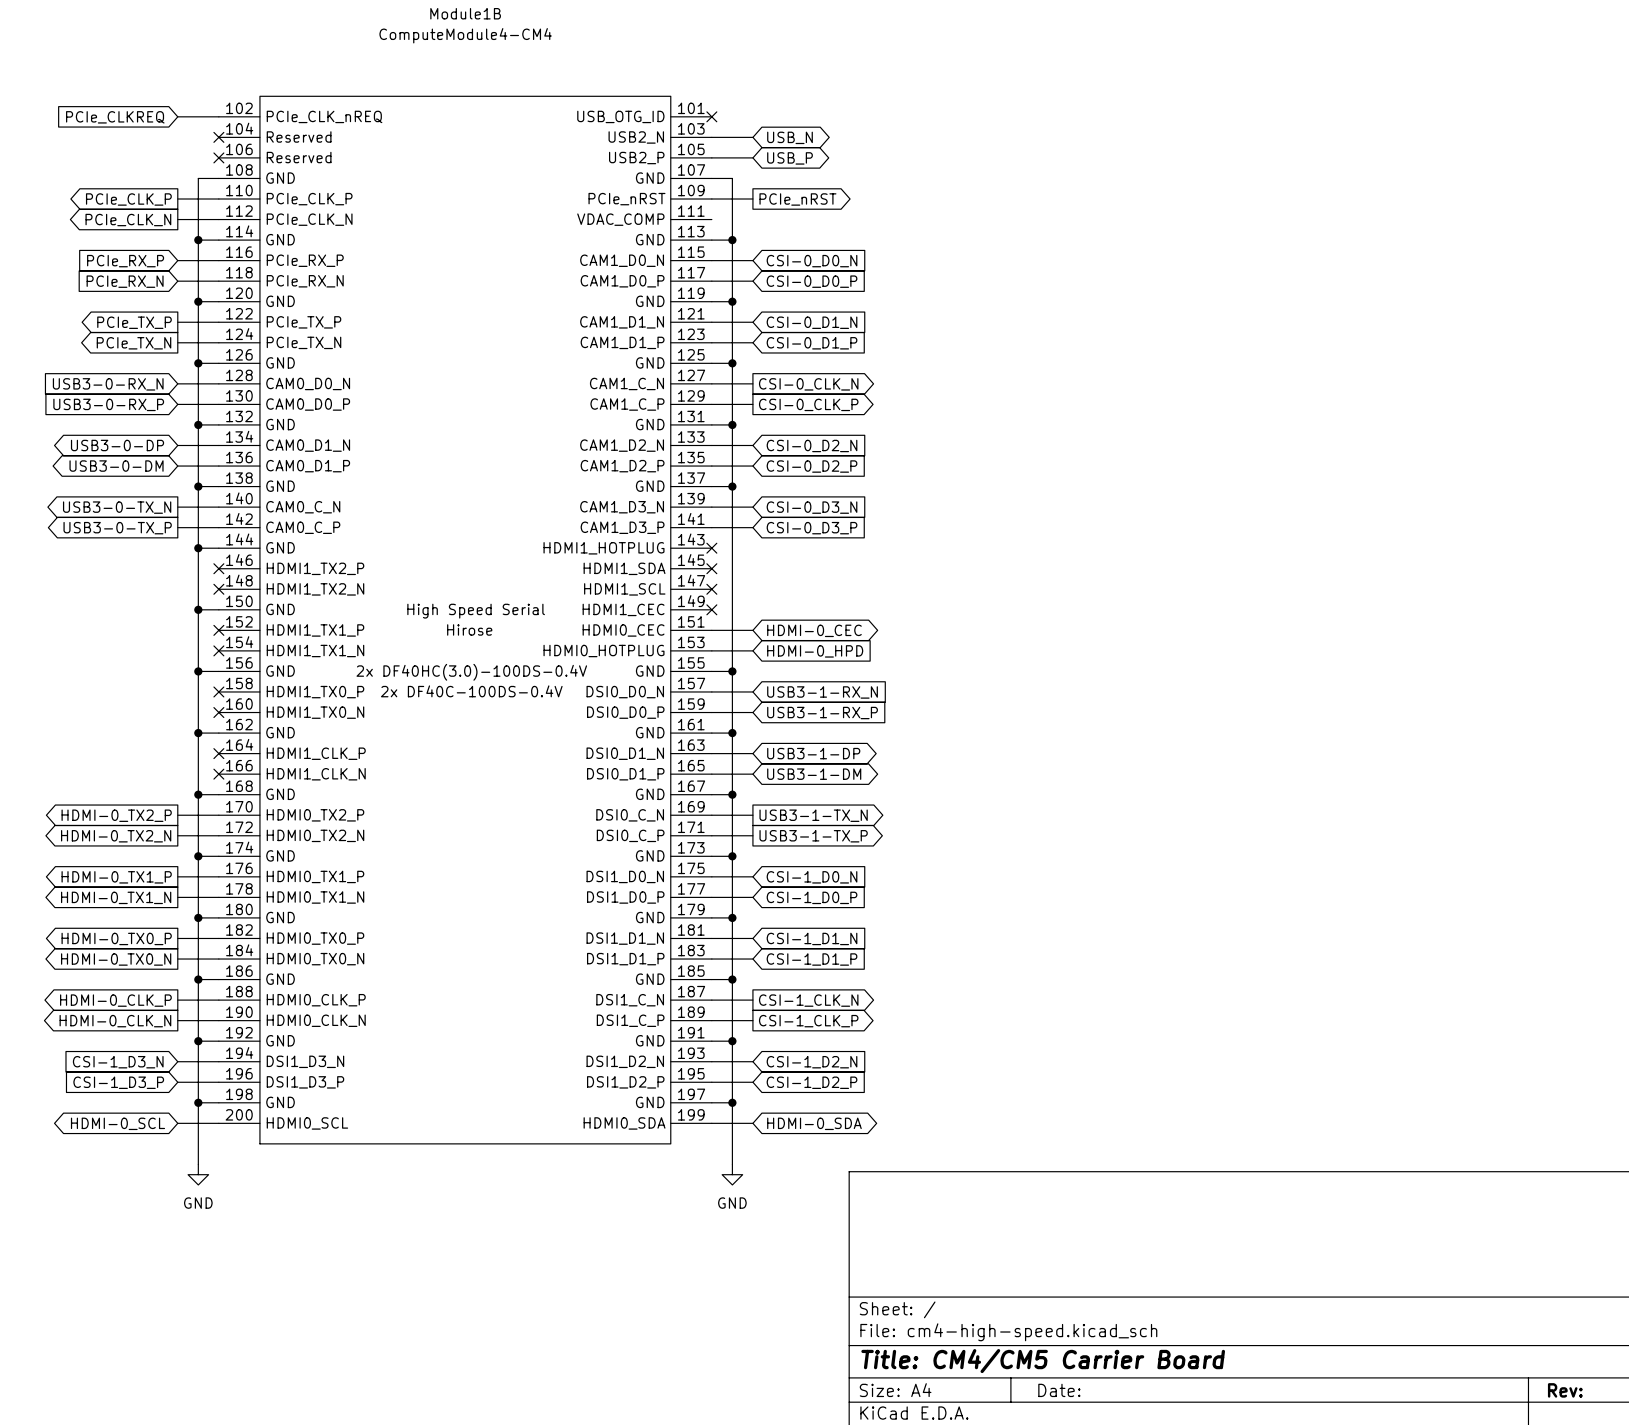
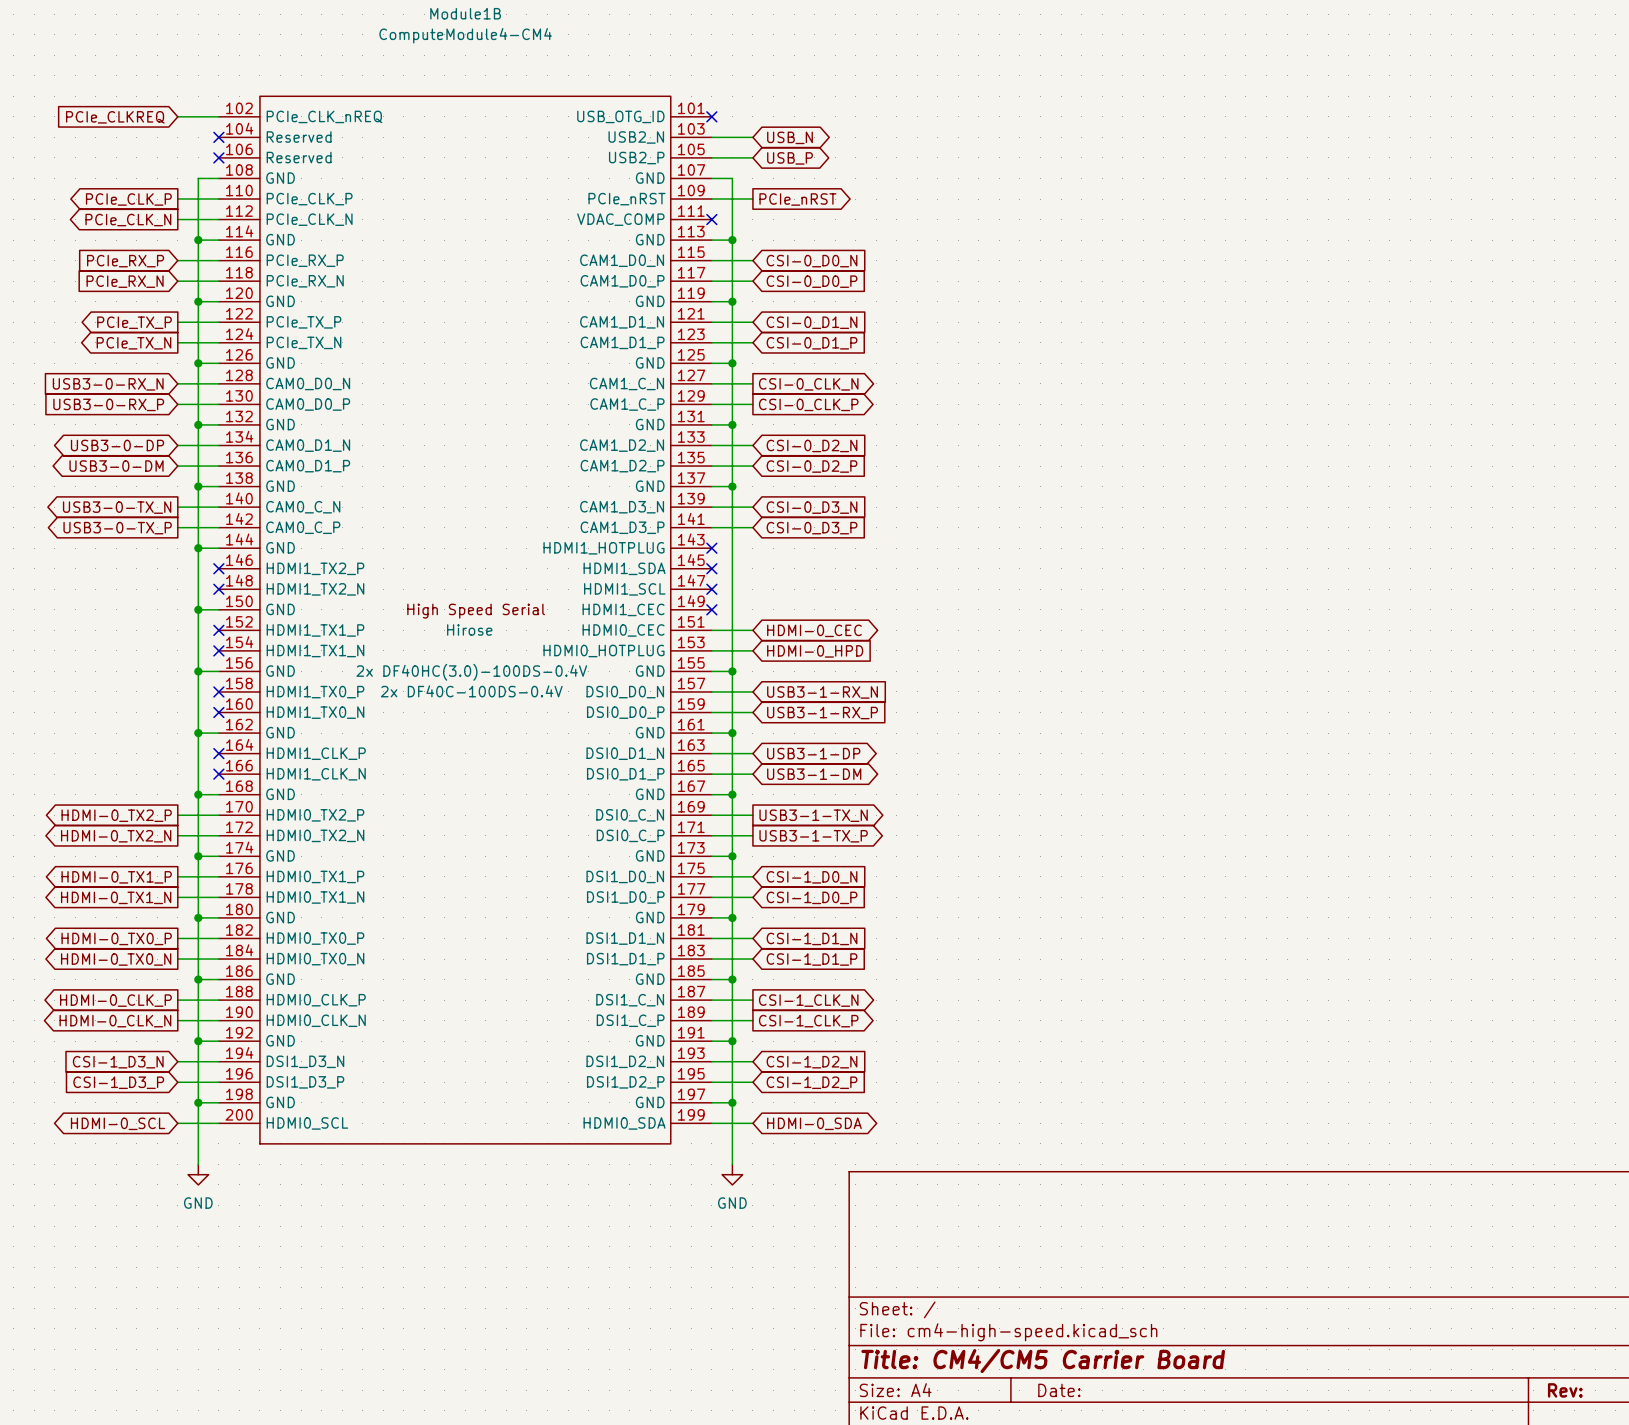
no-connect mark: none -> (711, 219)

